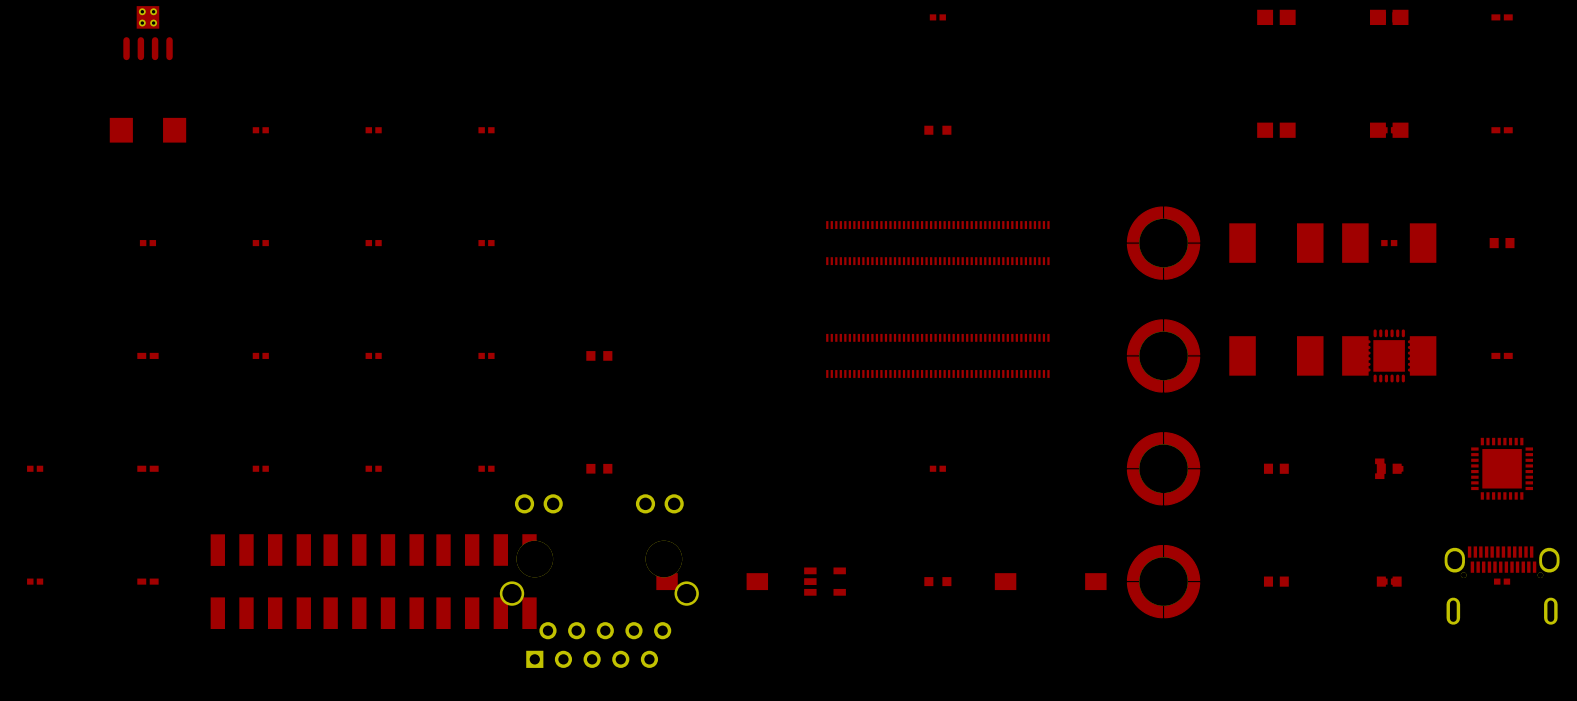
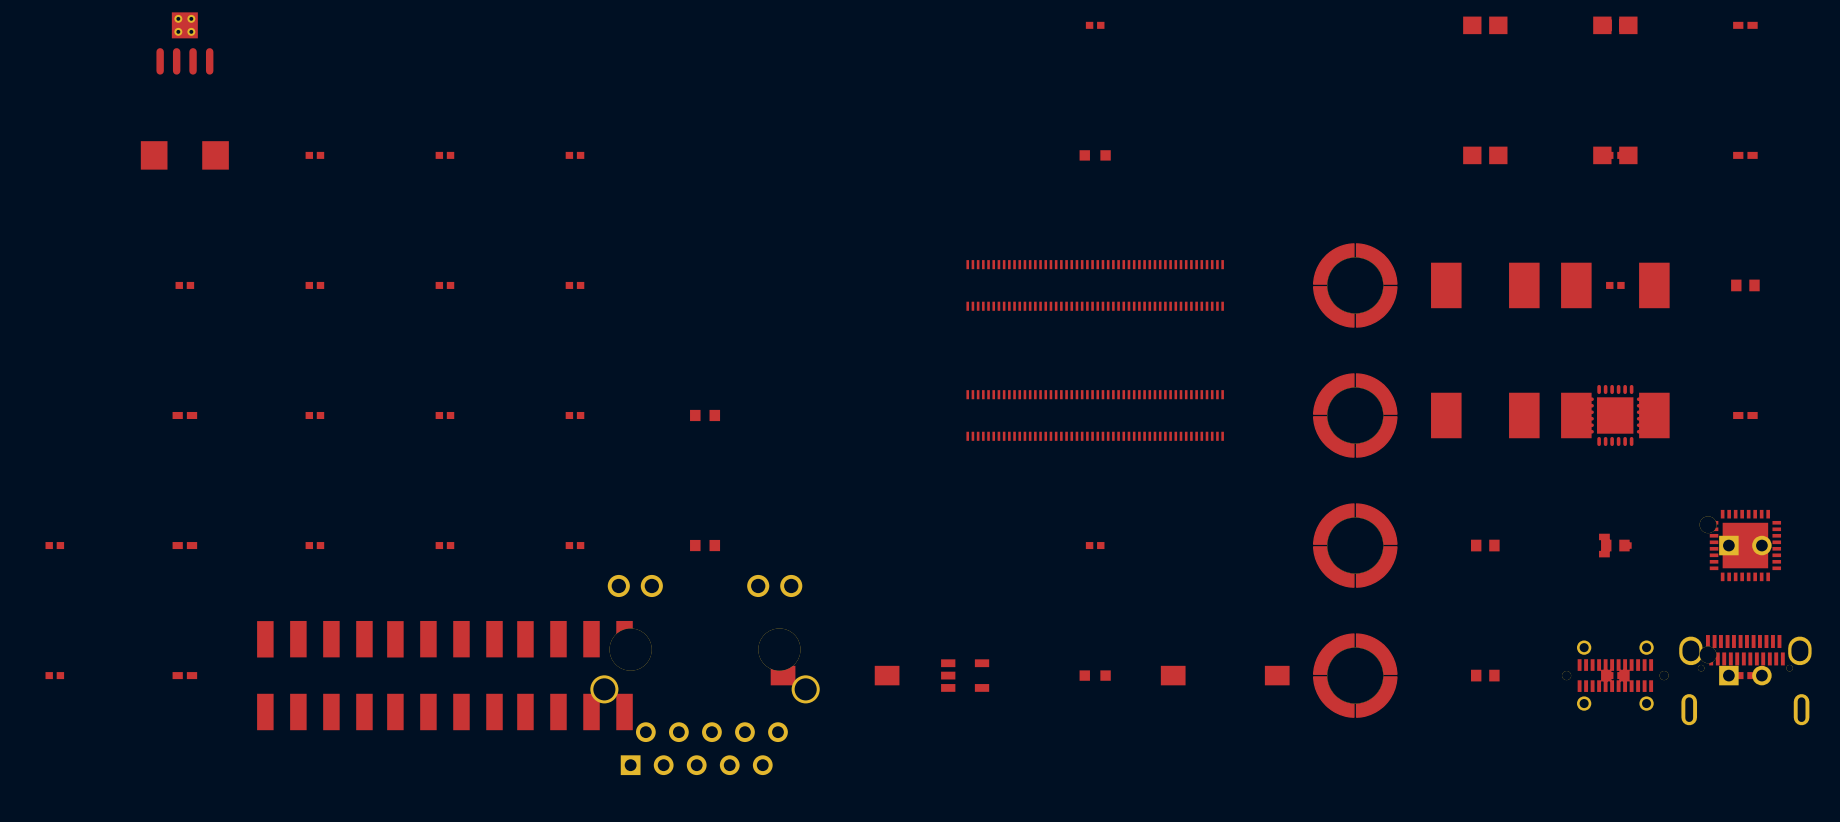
part: none -> (1735, 535)
part: none -> (1735, 665)
part: none -> (1615, 675)

